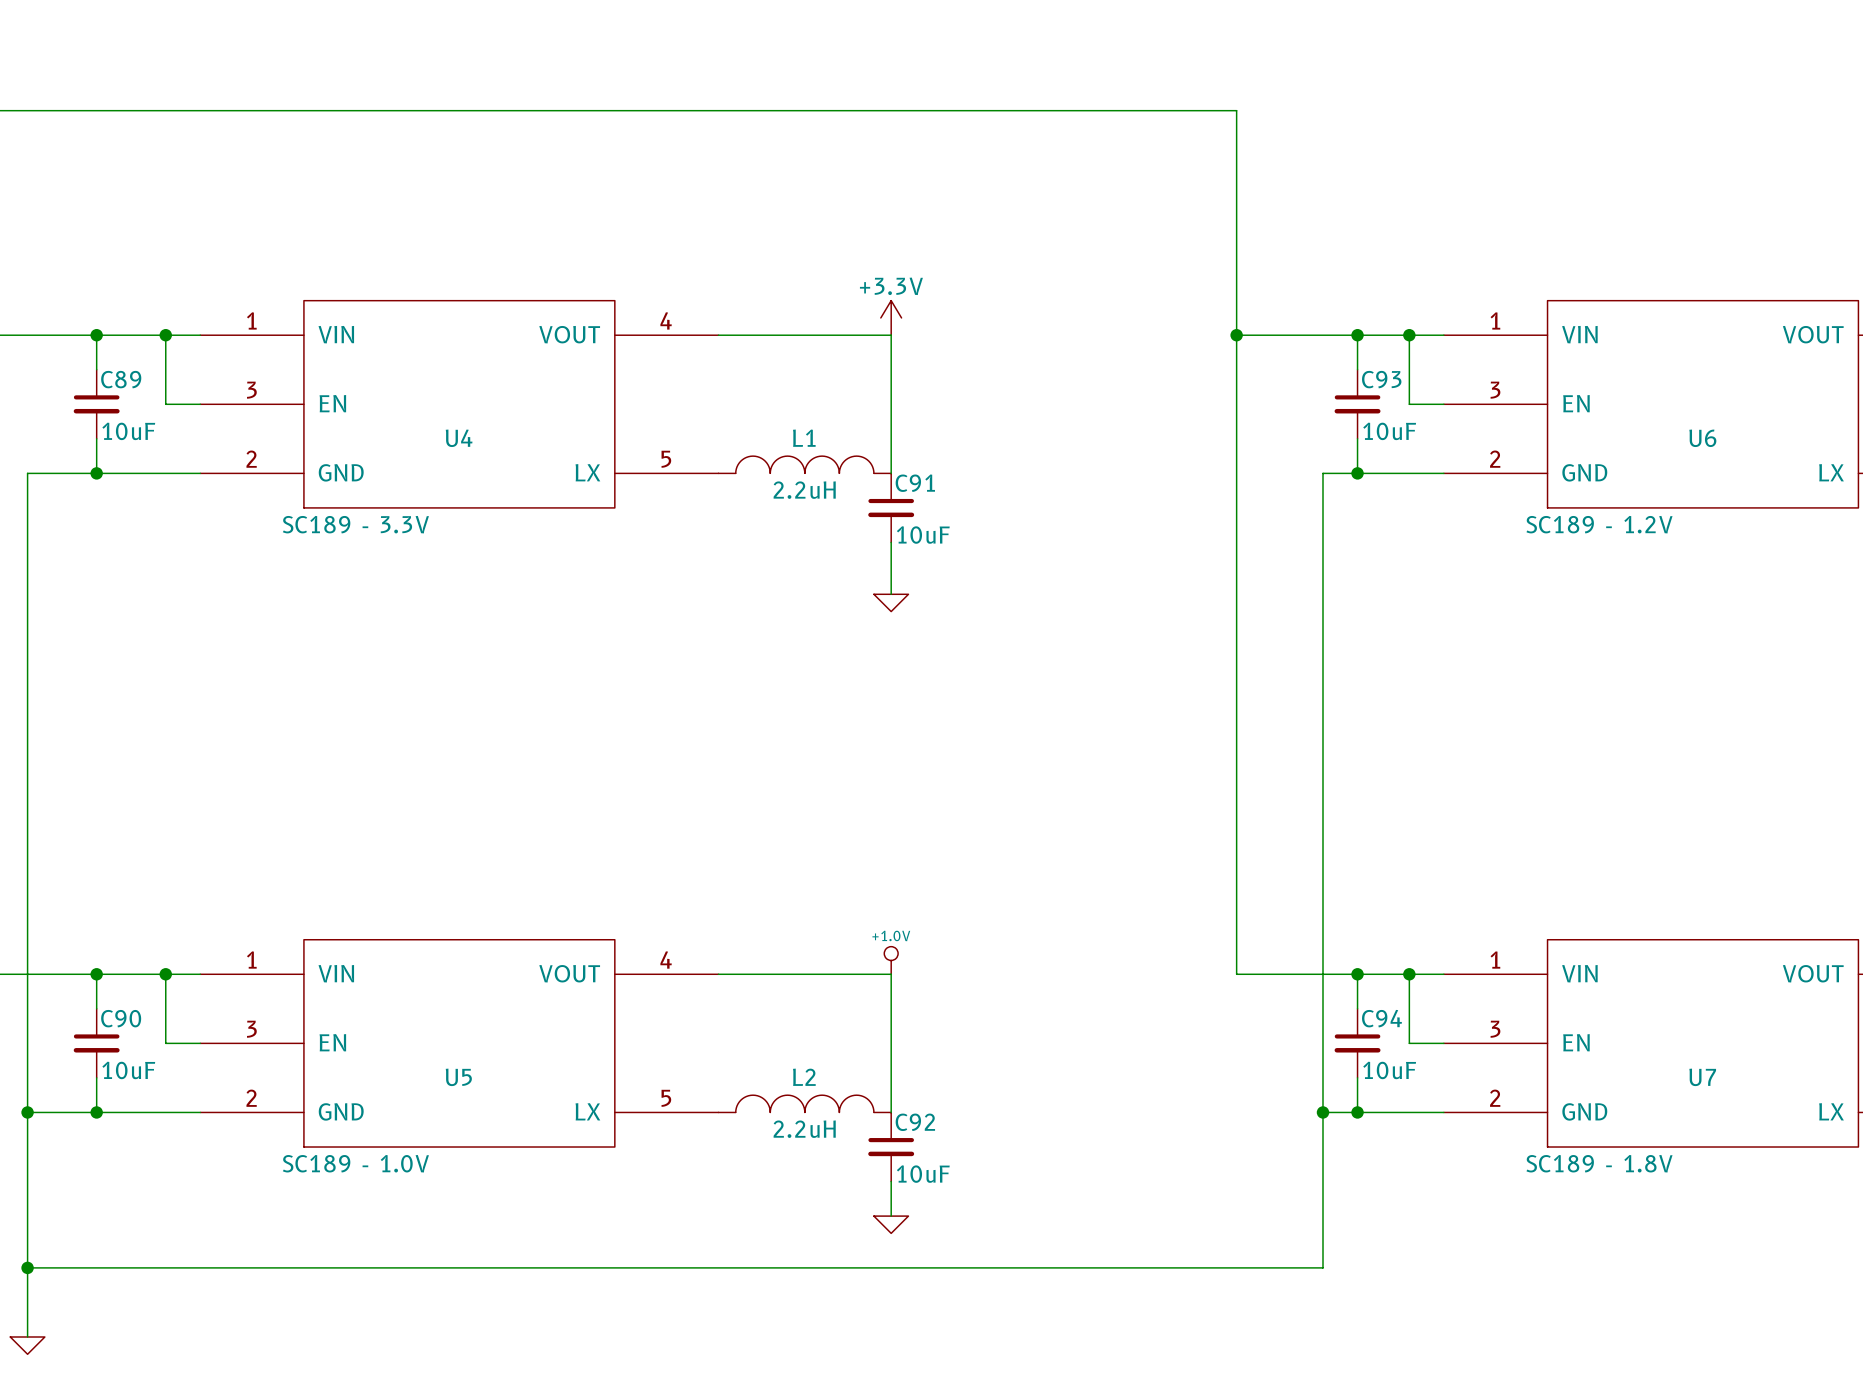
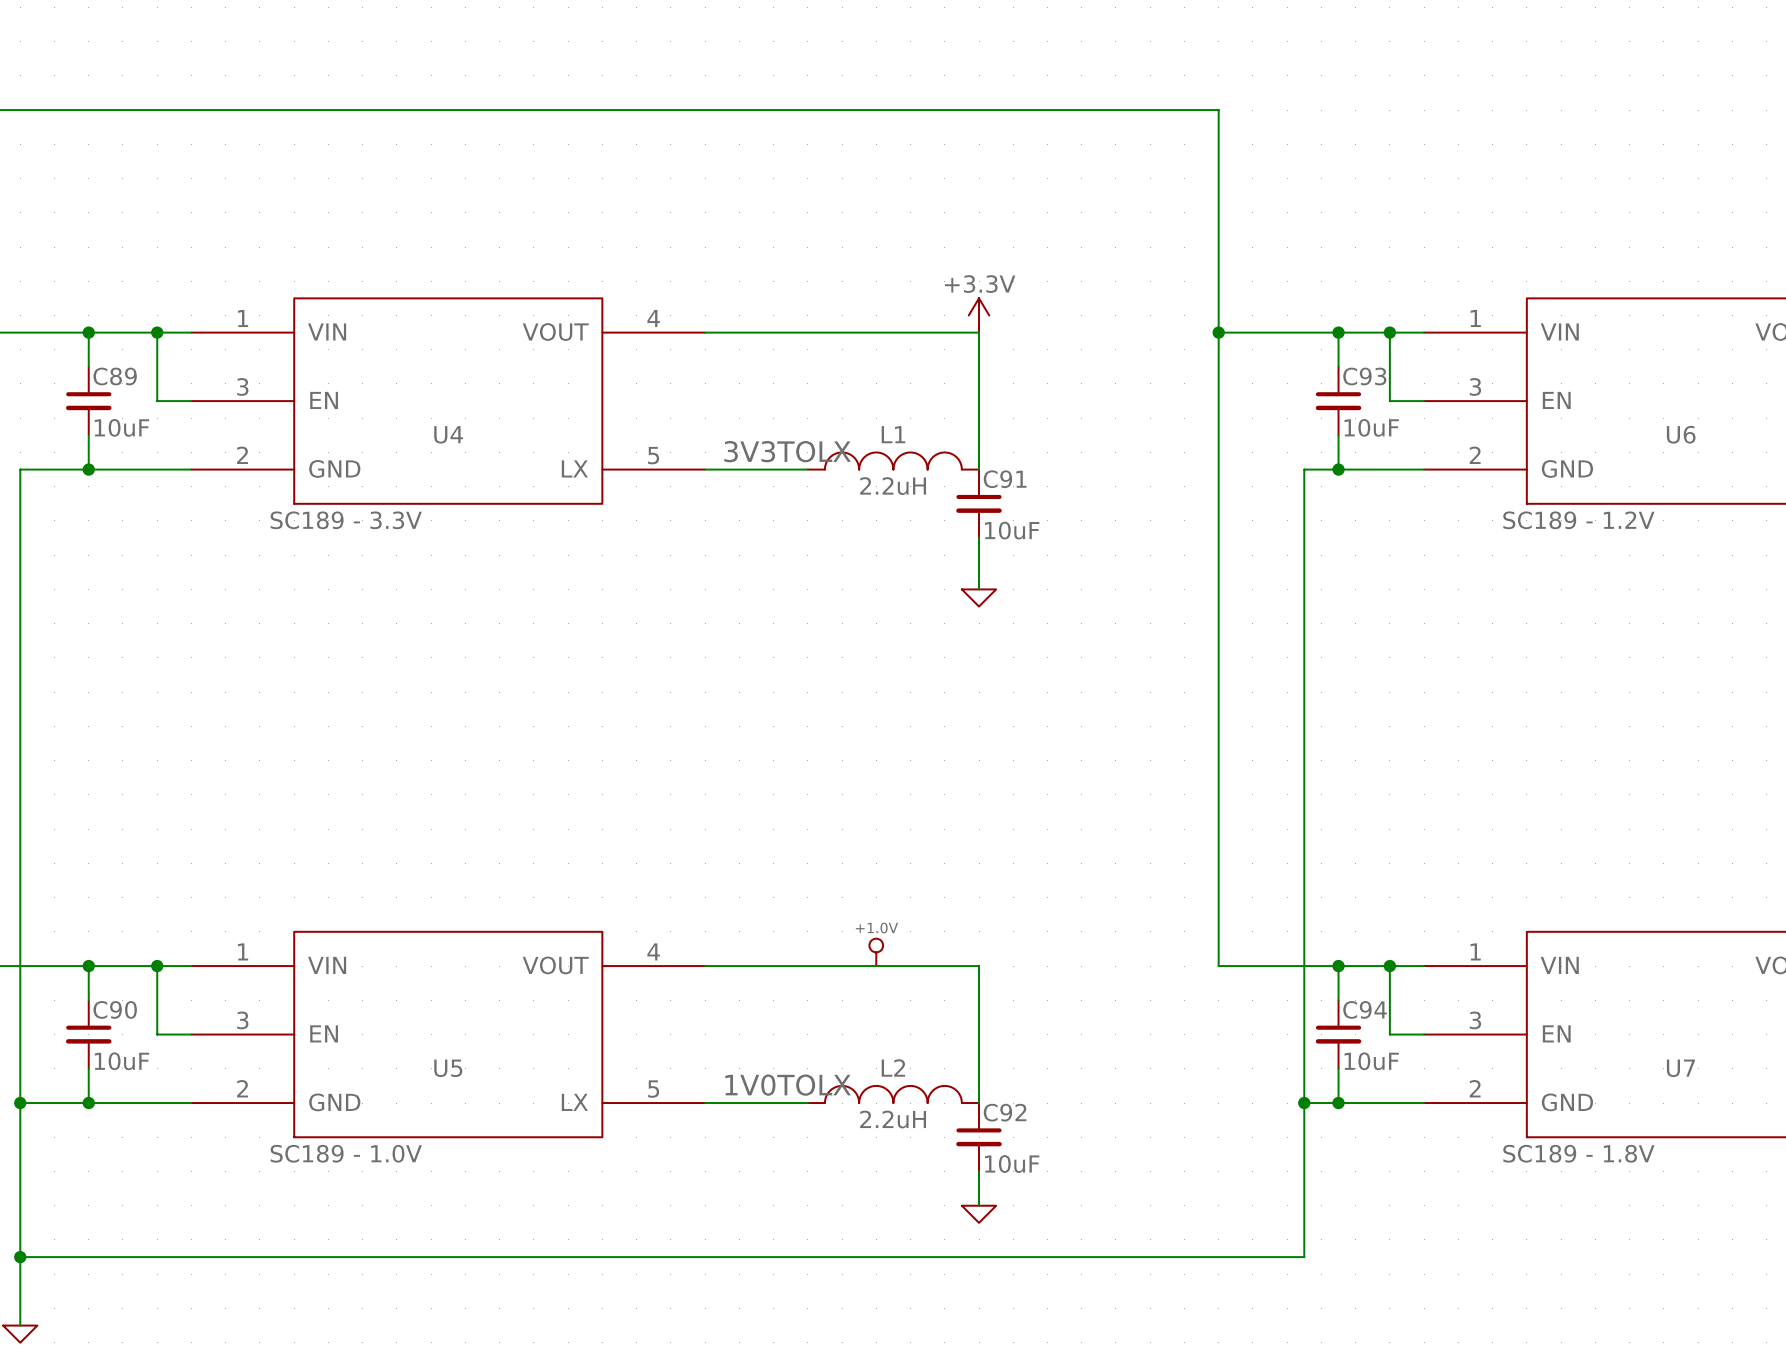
power symbol position: +3.3V (891, 317) -> +3.3V (979, 315)
wire: (891, 335) (891, 473) -> (876, 332) (979, 332) (979, 469)
label: none -> 3V3TOLX (787, 451)
L1 position: (804, 464) -> (893, 461)
wire: none -> (705, 469) (807, 469)
C91 position: (891, 507) -> (979, 503)
wire: (891, 542) (891, 594) -> (979, 538) (979, 589)
power symbol position: (891, 602) -> (979, 597)
wire: (891, 974) (891, 1112) -> (876, 966) (979, 966) (979, 1103)
label: none -> 1V0TOLX (788, 1085)
L2 position: (804, 1103) -> (893, 1094)
wire: none -> (705, 1103) (807, 1103)
C92 position: (891, 1147) -> (979, 1137)
wire: (891, 1181) (891, 1216) -> (979, 1171) (979, 1205)
power symbol position: (891, 1224) -> (979, 1214)

